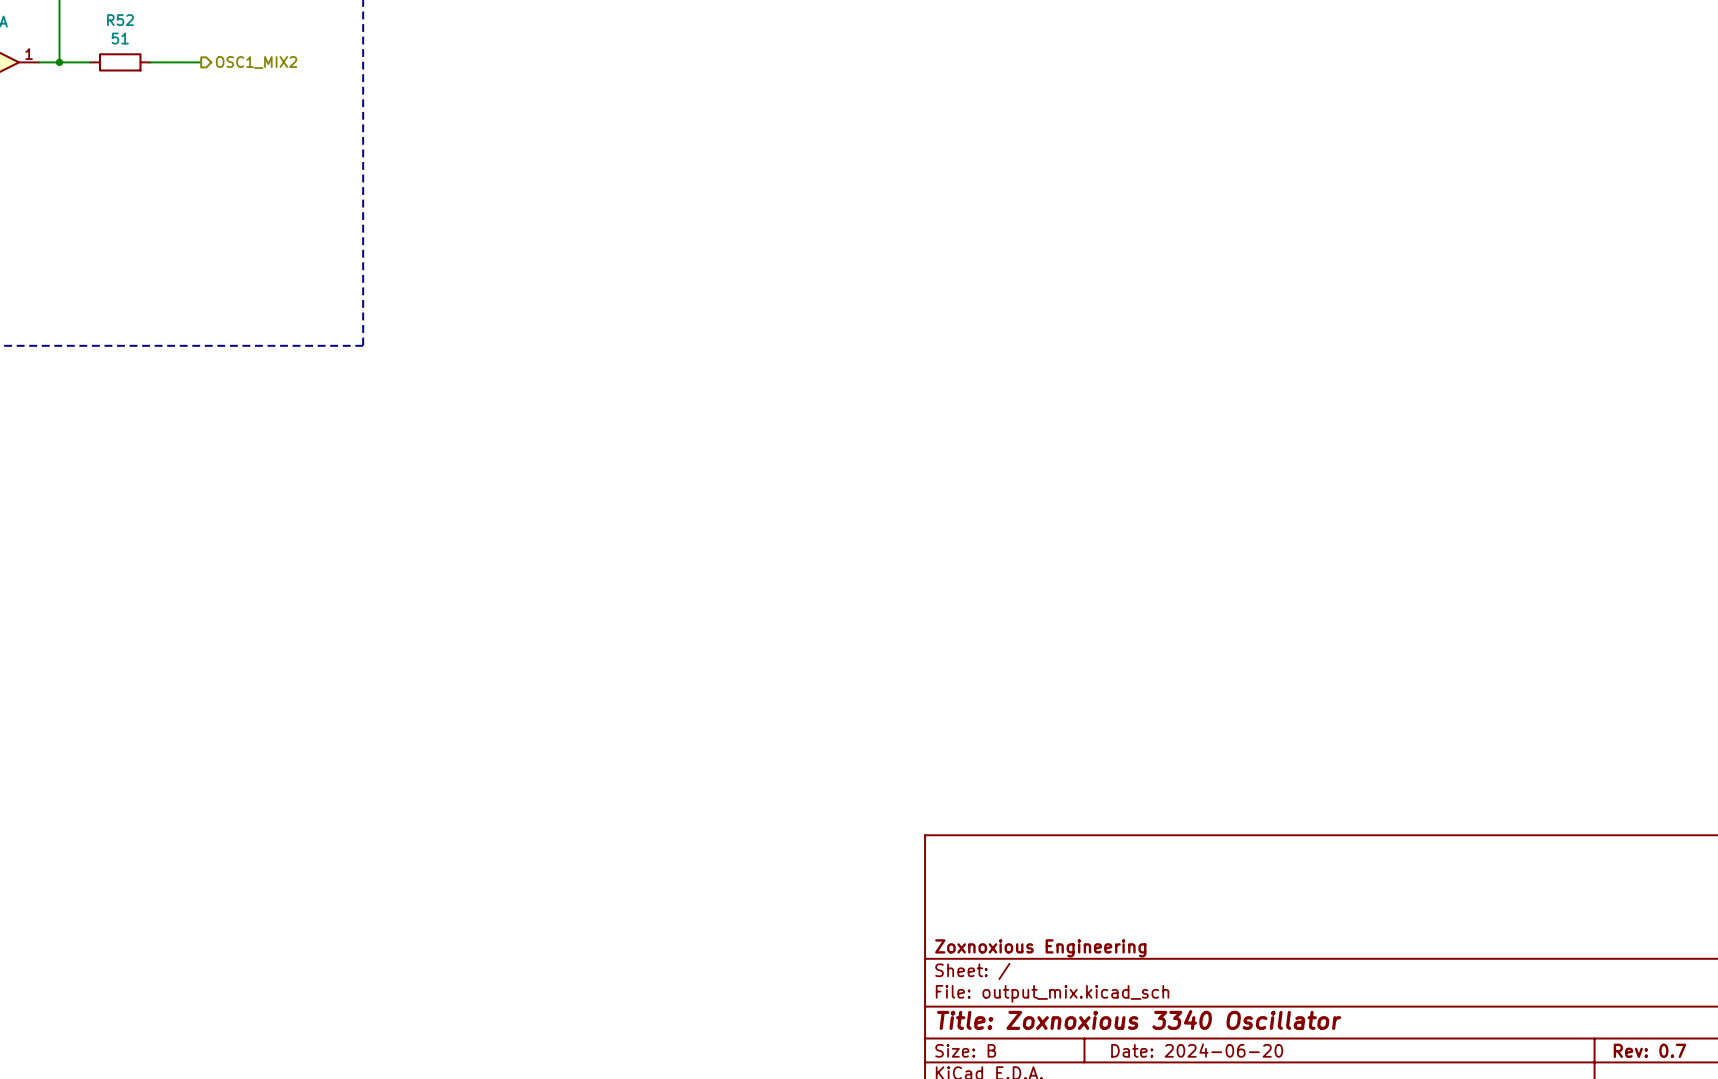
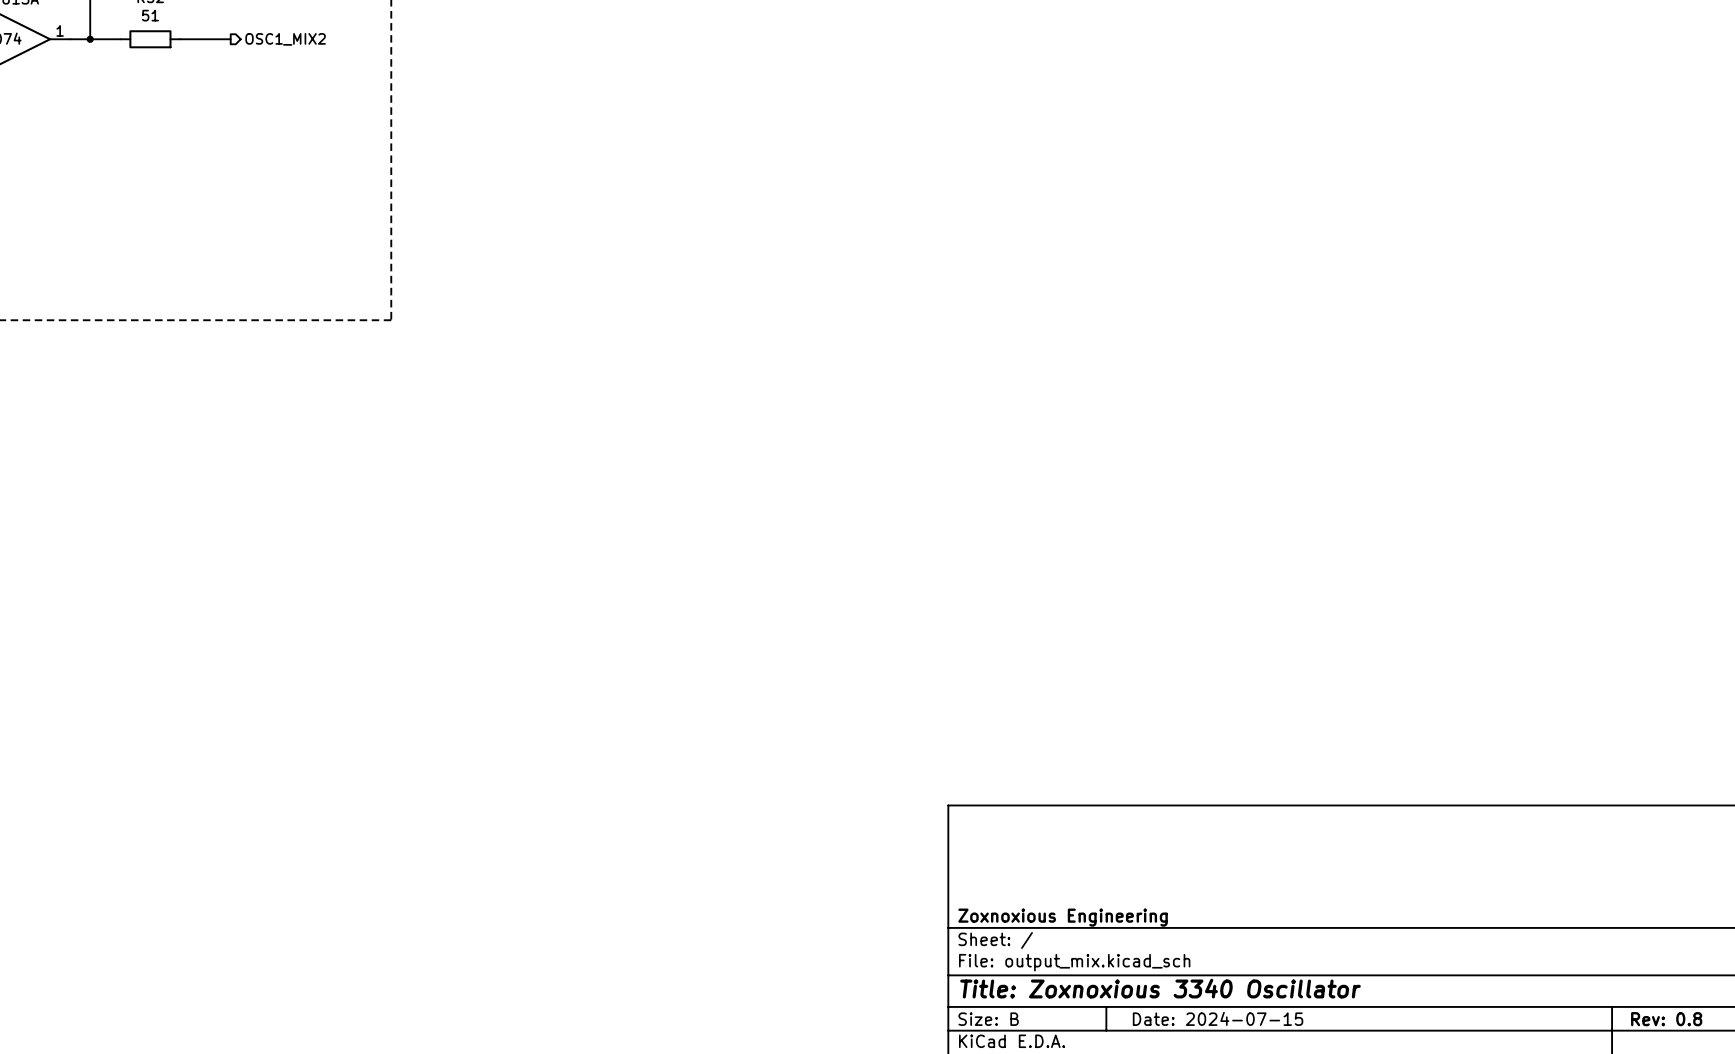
title block: Date: 2024-06-20 (1197, 1050) -> Date: 2024-07-15 (1218, 1018)
title block: Rev: 0.7 (1649, 1050) -> Rev: 0.8 (1666, 1019)

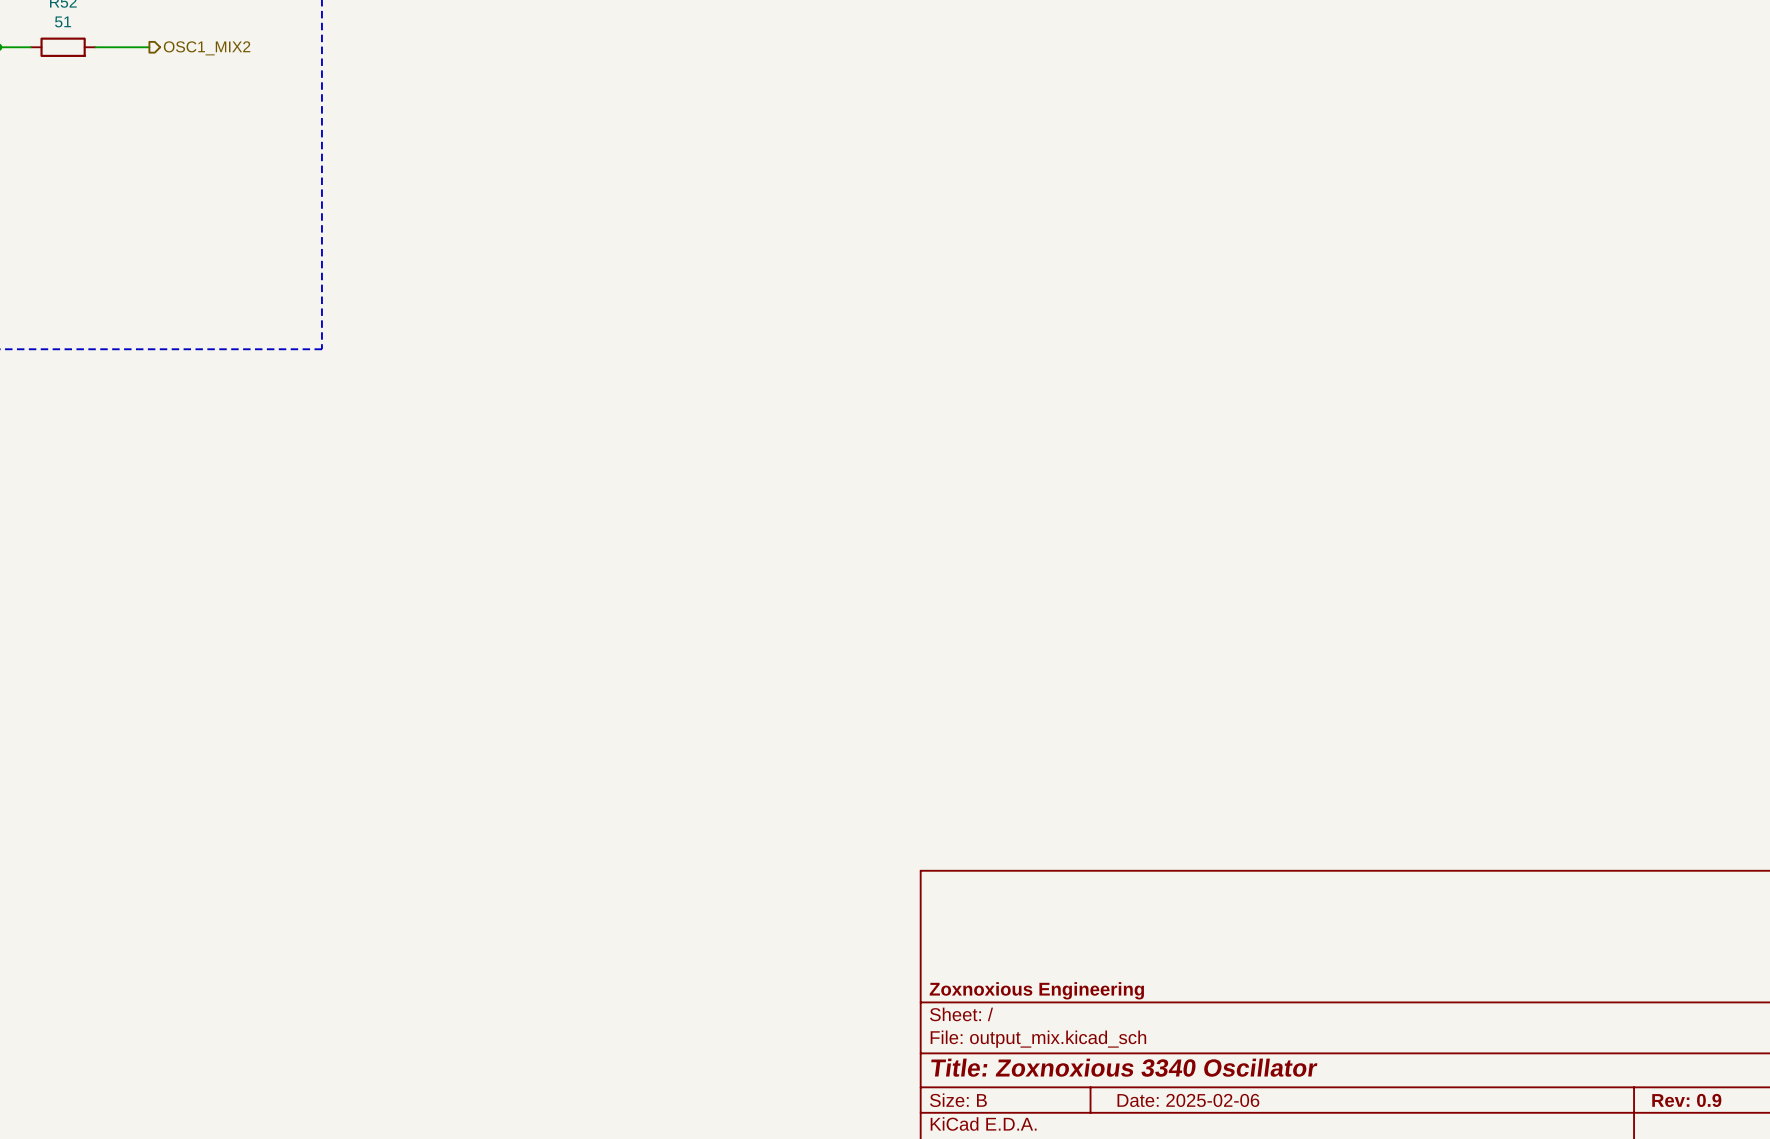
title block: Date: 2024-07-15 (1218, 1018) -> Date: 2025-02-06 (1188, 1100)
title block: Rev: 0.8 (1666, 1019) -> Rev: 0.9 (1686, 1100)

